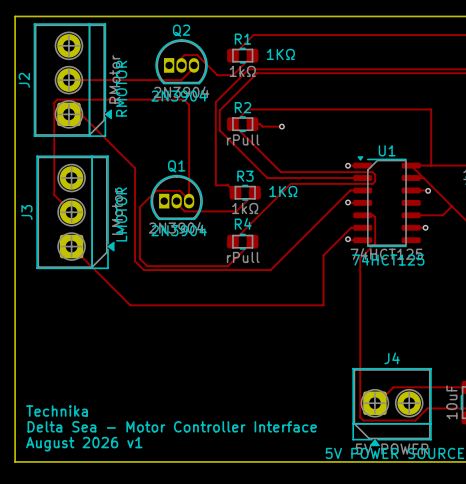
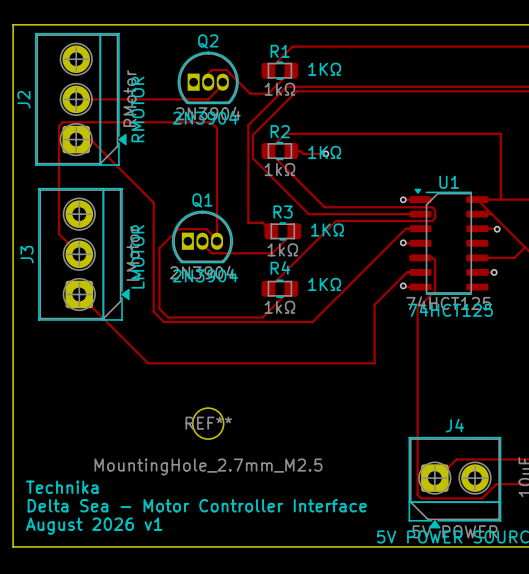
text: none -> 1KΩ (324, 152)
R2 value: rPull (243, 139) -> 1kΩ (279, 169)
text: none -> 1KΩ (324, 284)
R4 value: rPull (243, 257) -> 1kΩ (279, 307)
REF**: none -> MountingHole_2.7mm_M2.5 (208, 423)

